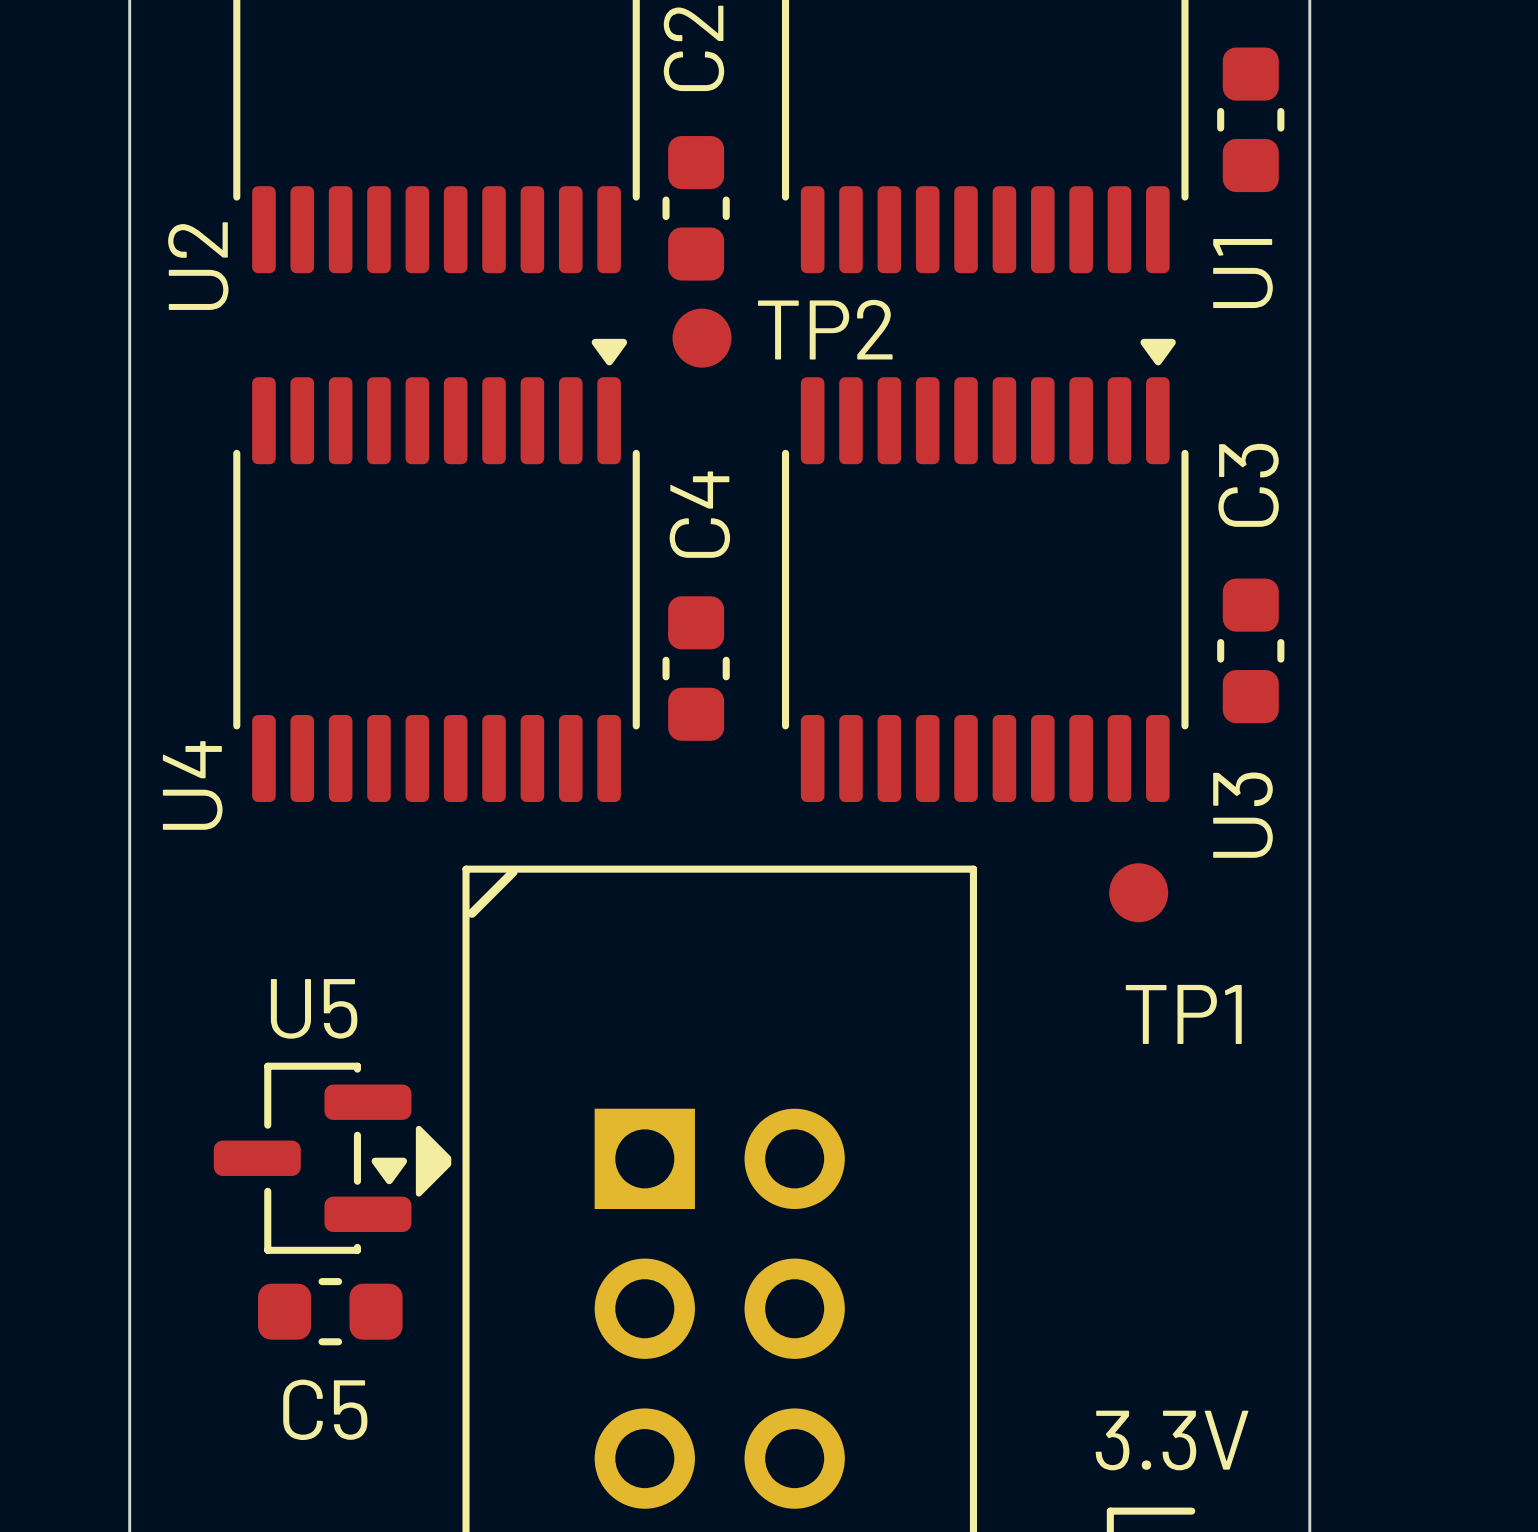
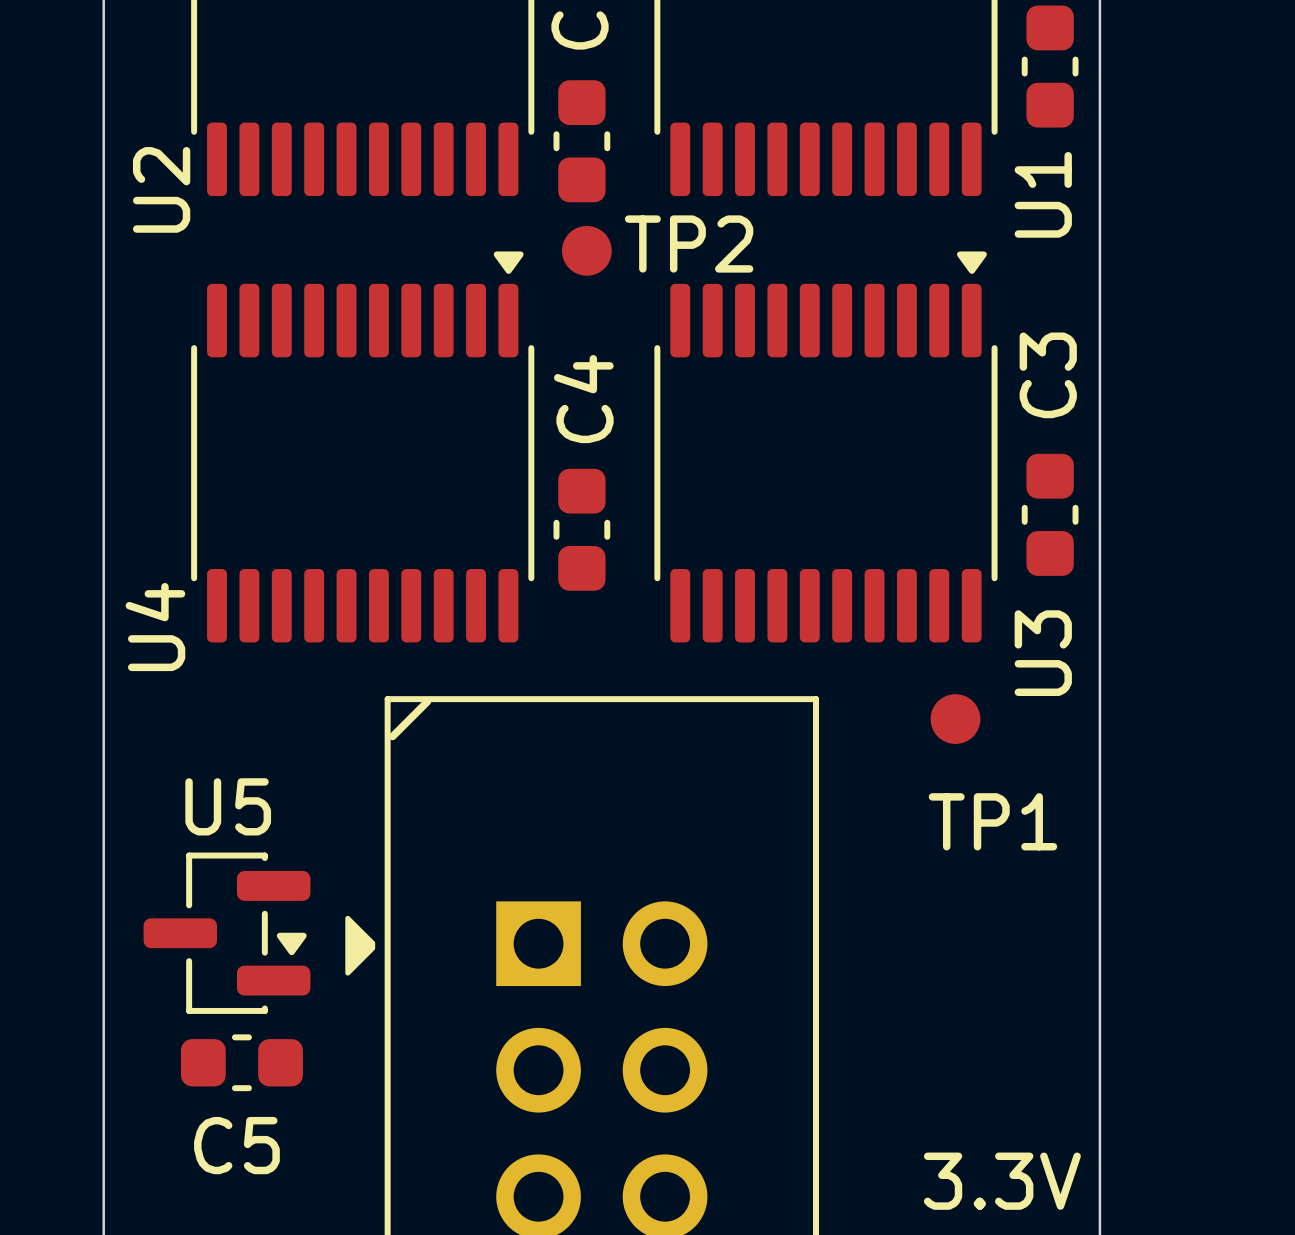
U5 position: (312, 1158) -> (226, 933)
C5 position: (330, 1311) -> (241, 1062)

